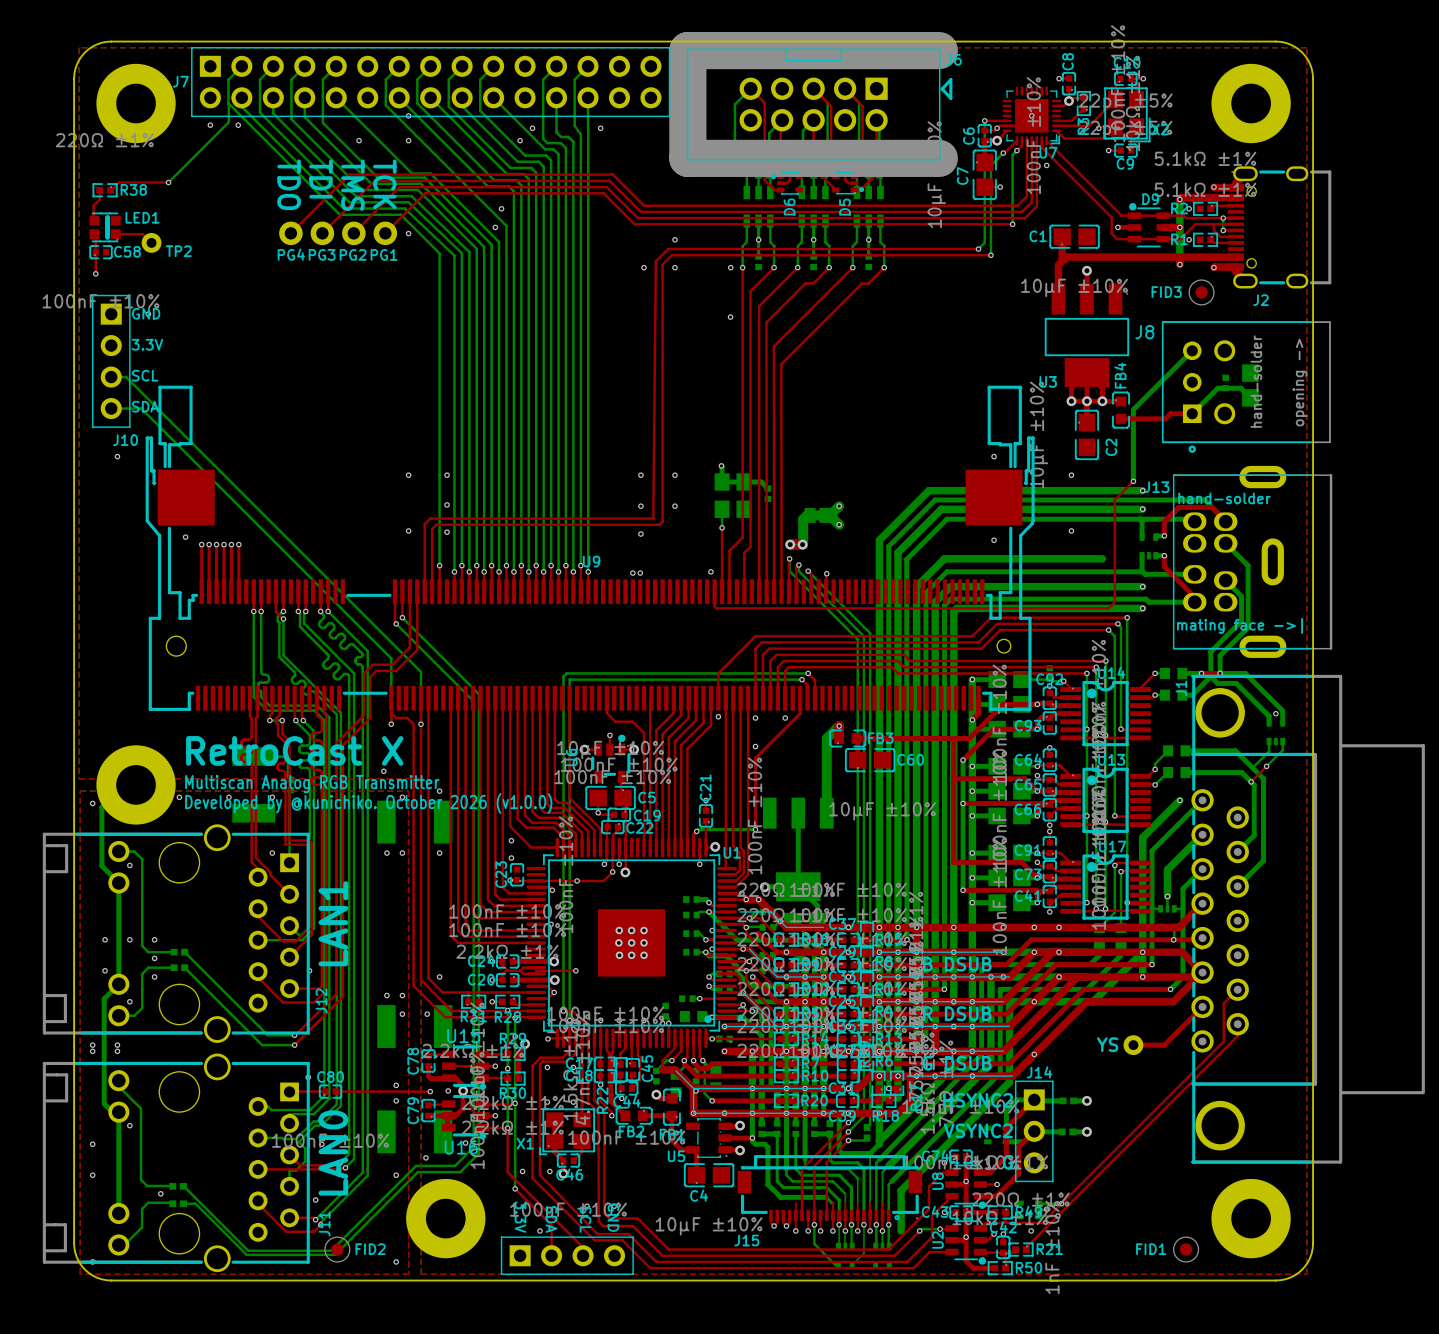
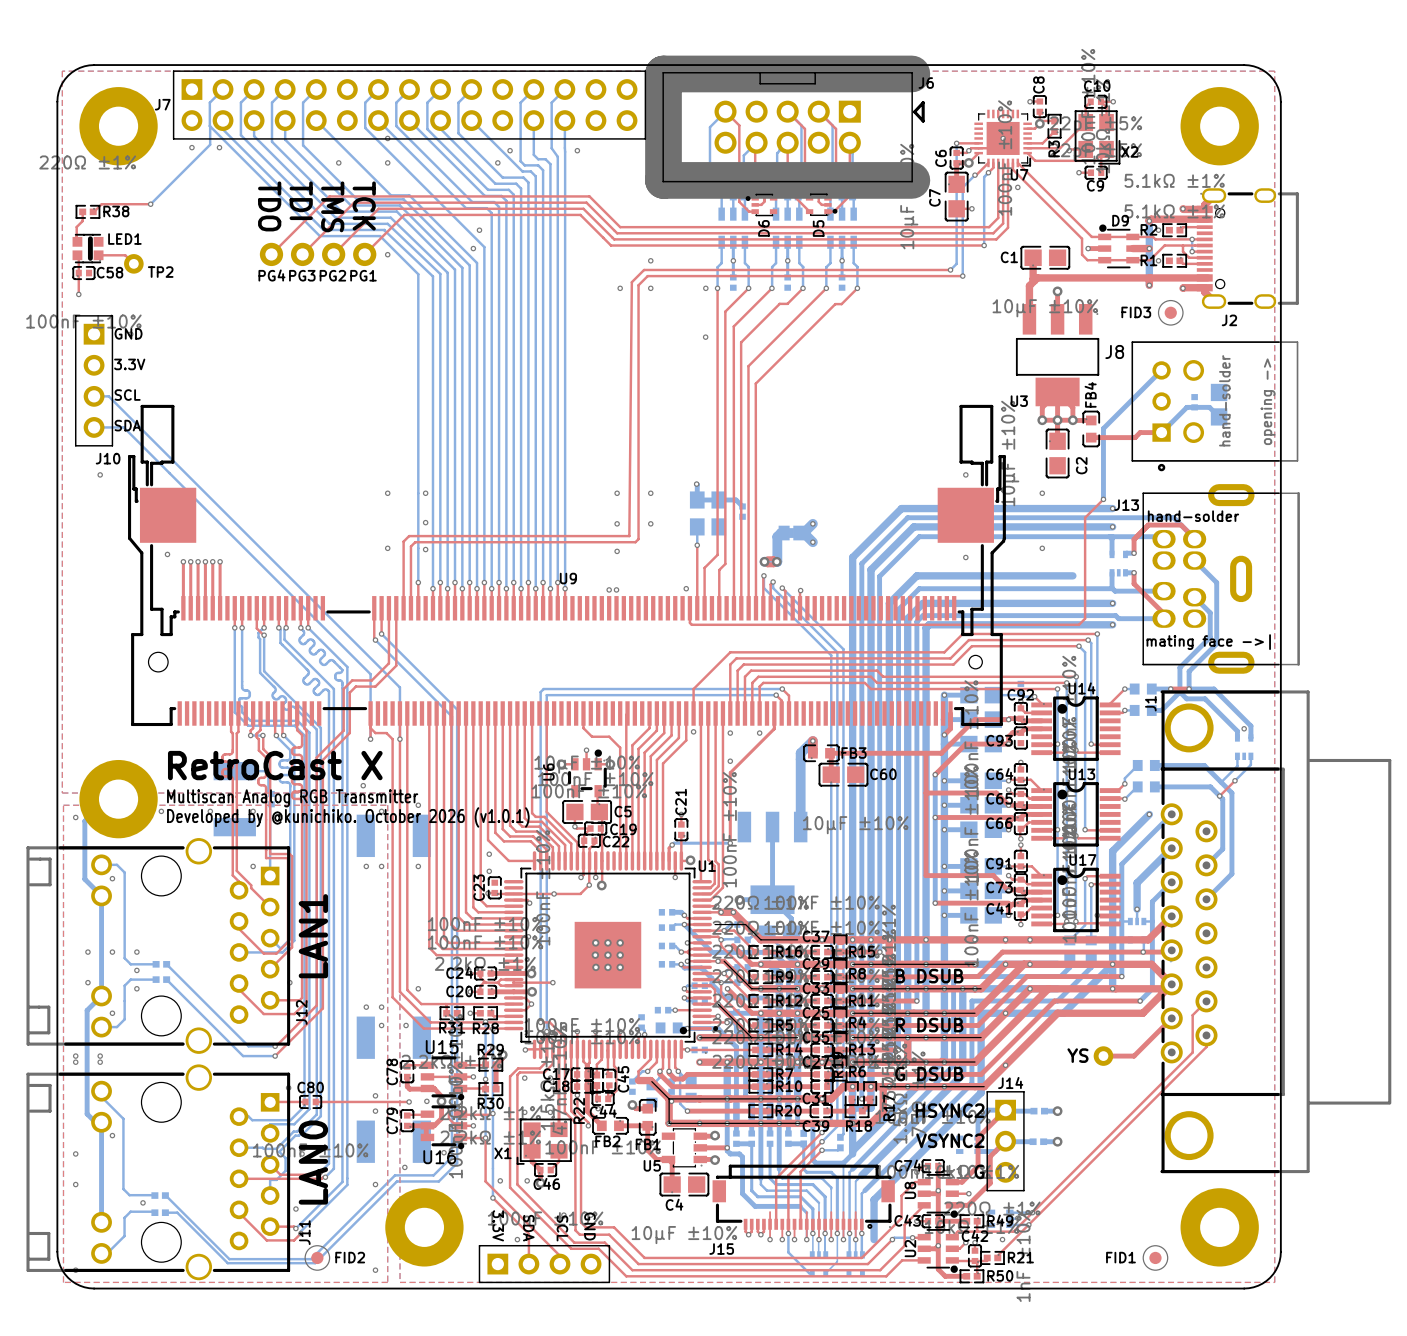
text: Developed by @kunichiko. October 2026 (v1.0.0) (368, 803) -> Developed by @kunichiko. October 2026 (v1.0.1) (348, 817)

